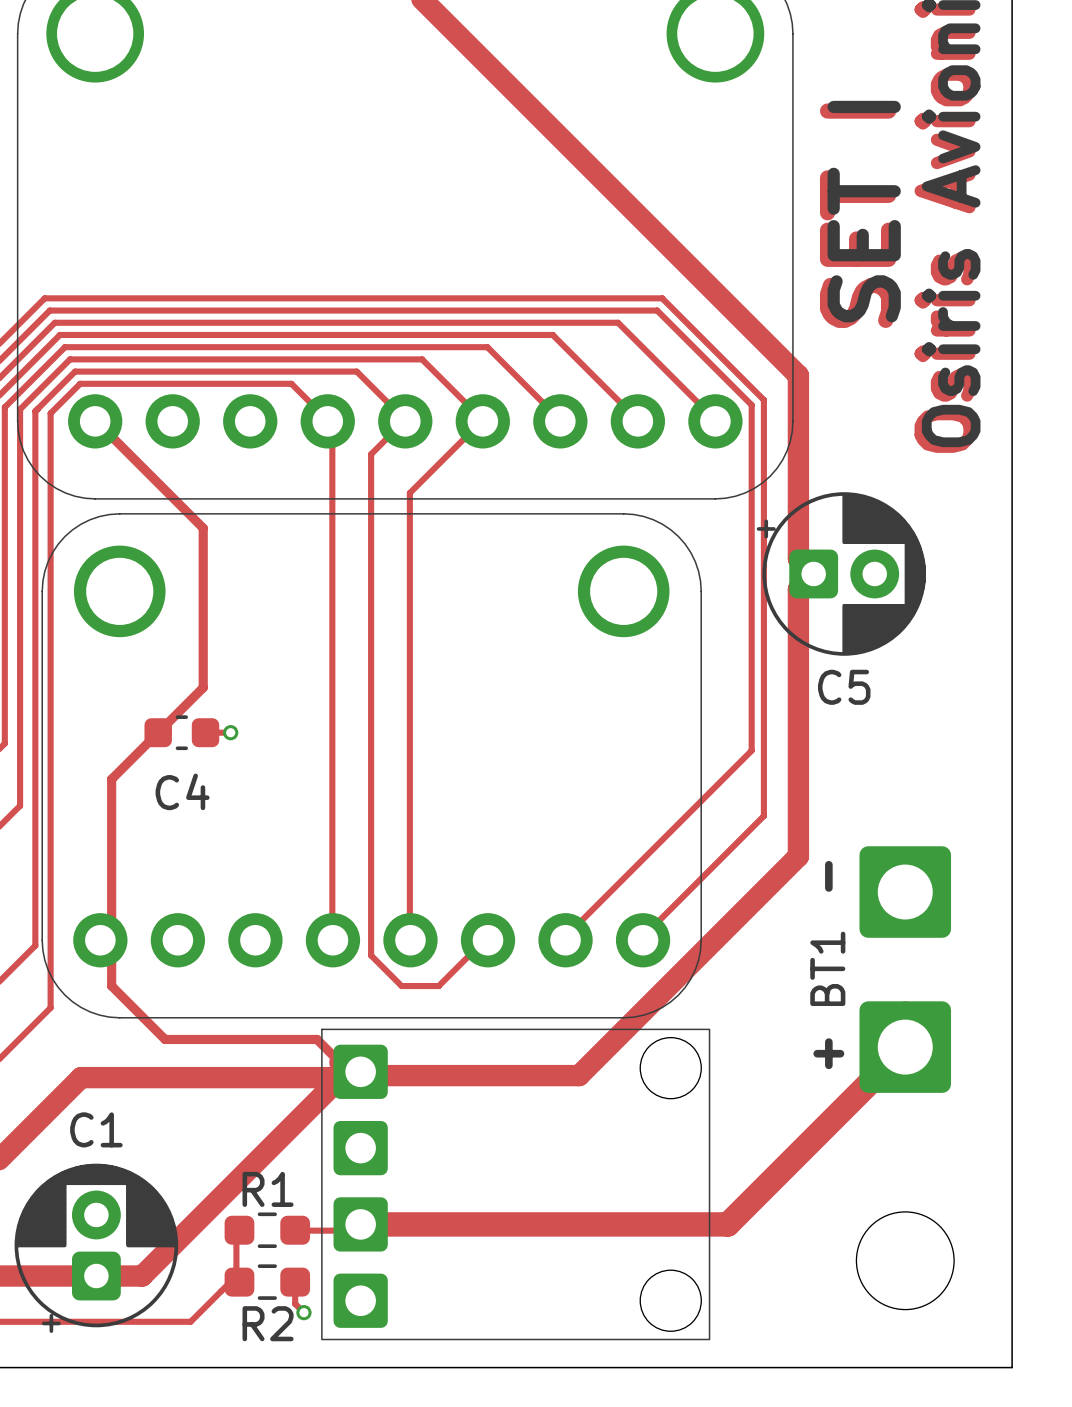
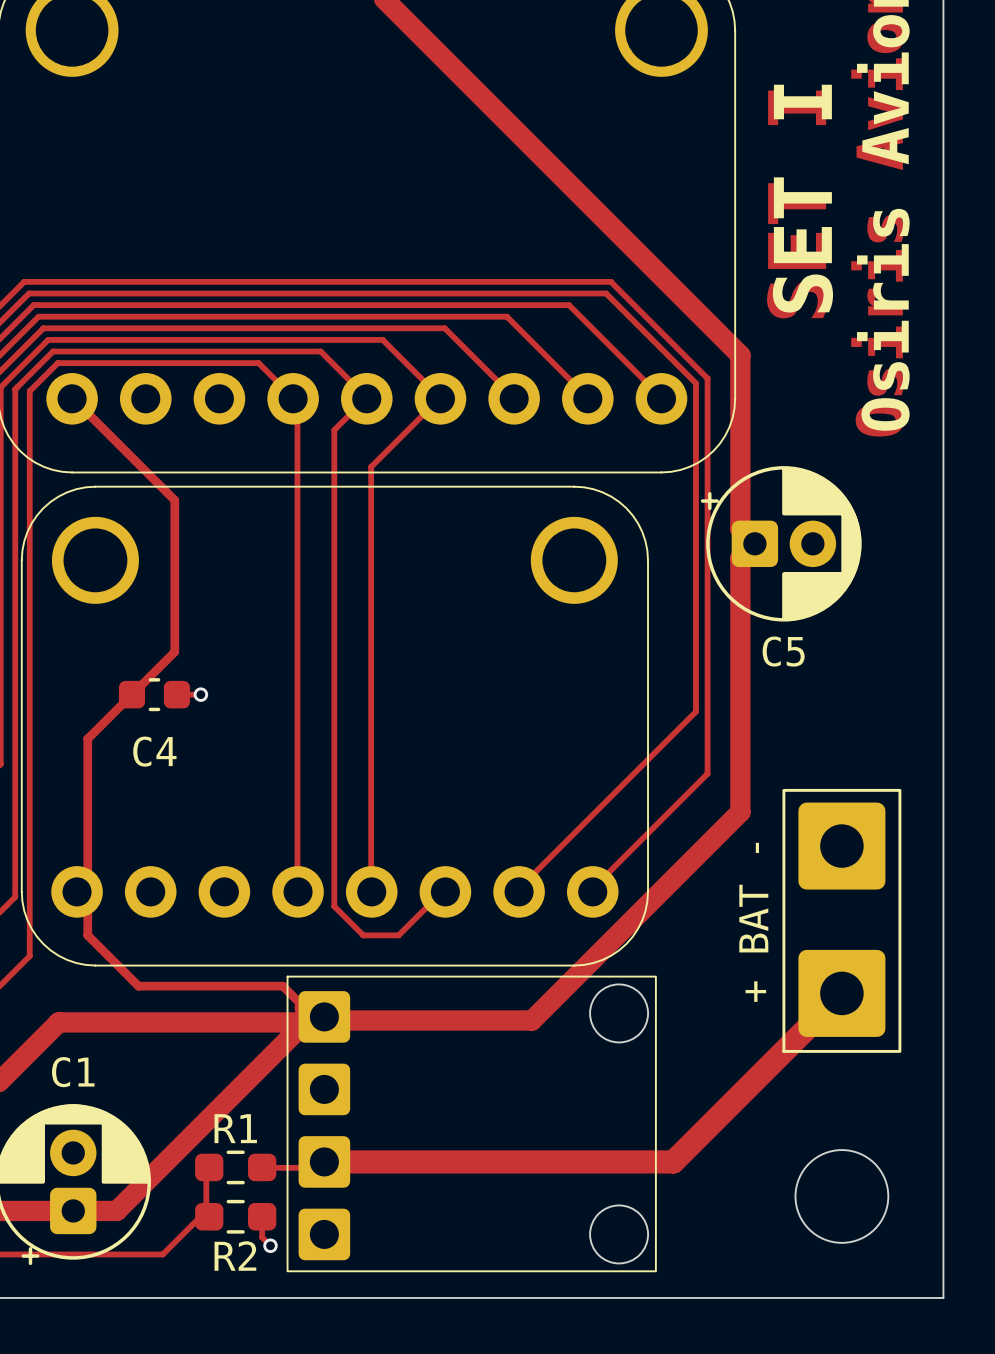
BT1: (905, 969) -> none
+ BAT -: none -> (841, 920)

